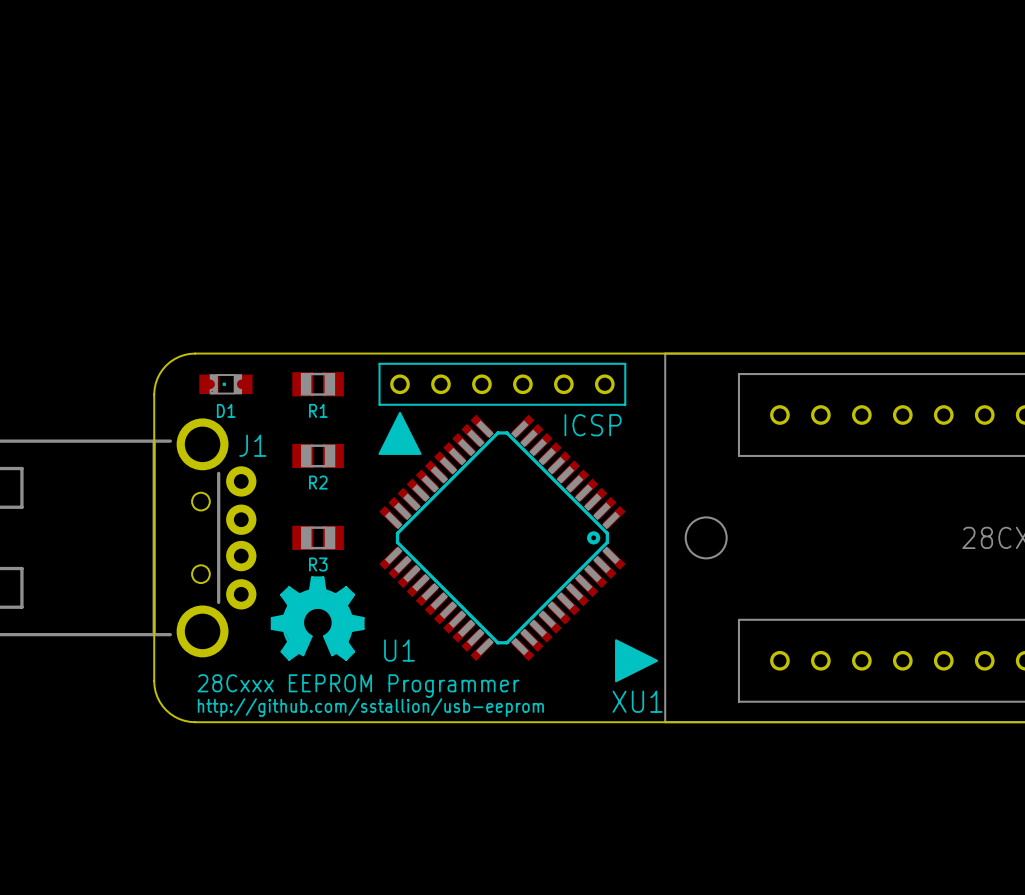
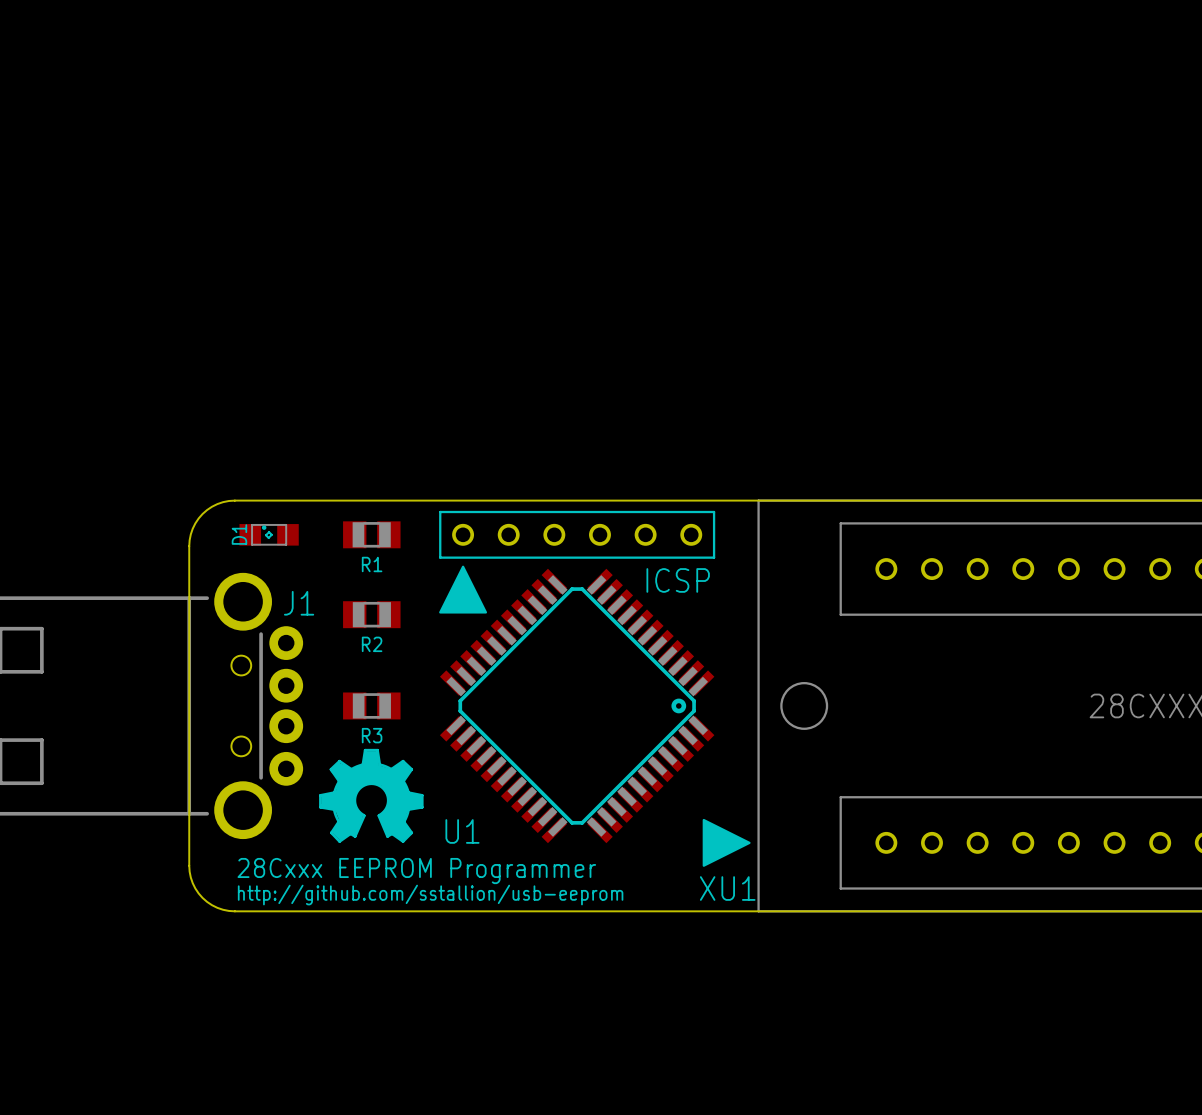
D1 footprint: [199, 374, 253, 395] -> [239, 524, 299, 546]
D1 name rotation: 0° (226, 410) -> 90° counterclockwise (239, 534)
D1 name position: D1 (226, 410) -> D1 (239, 534)

